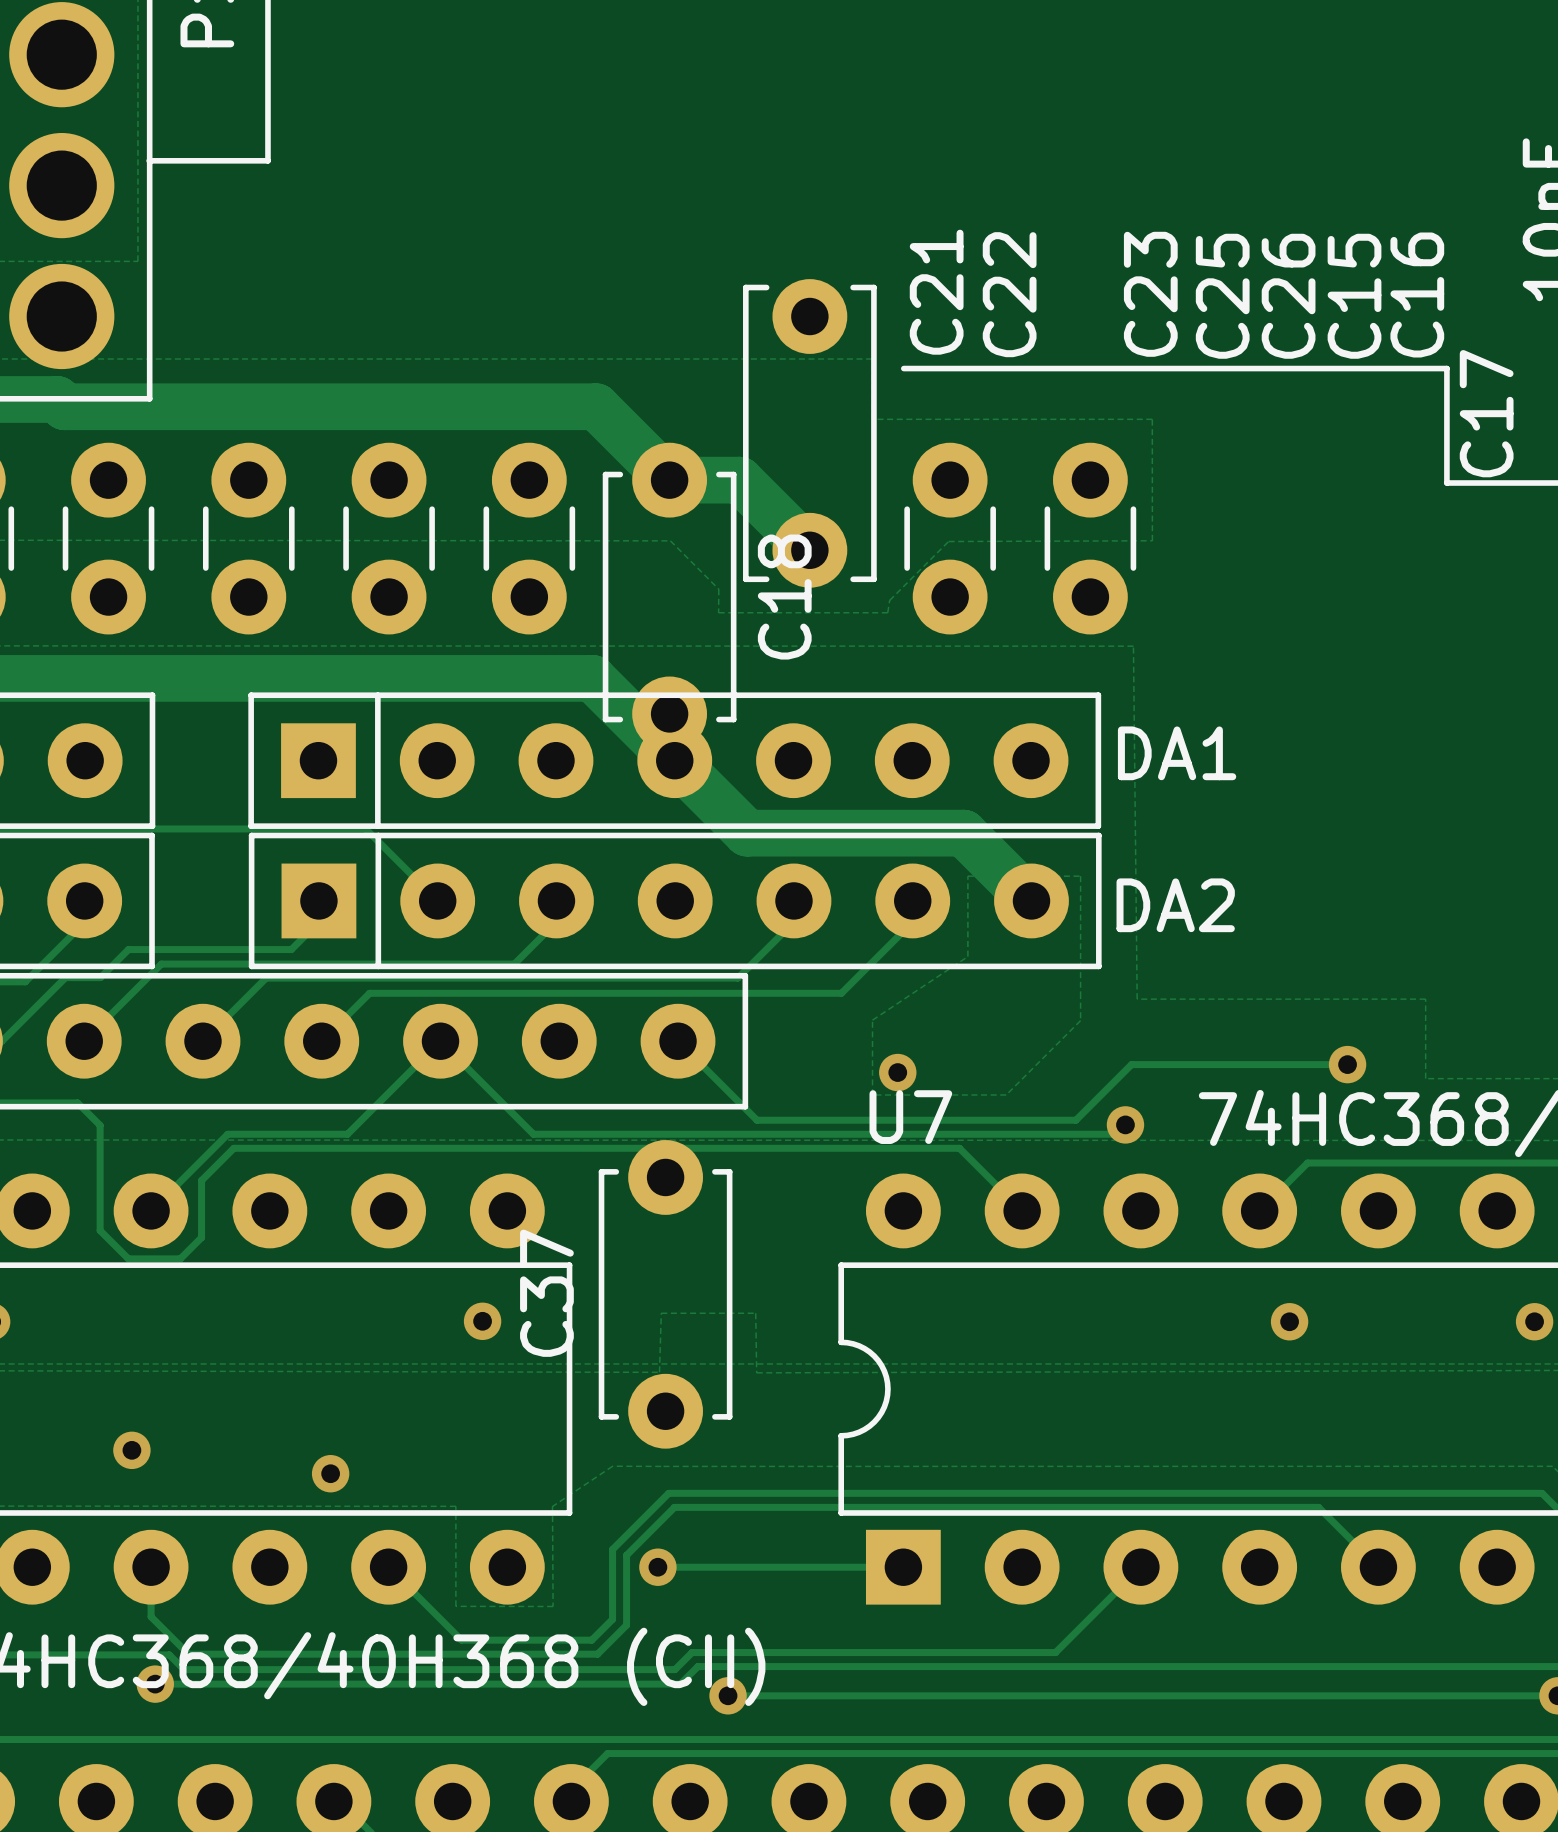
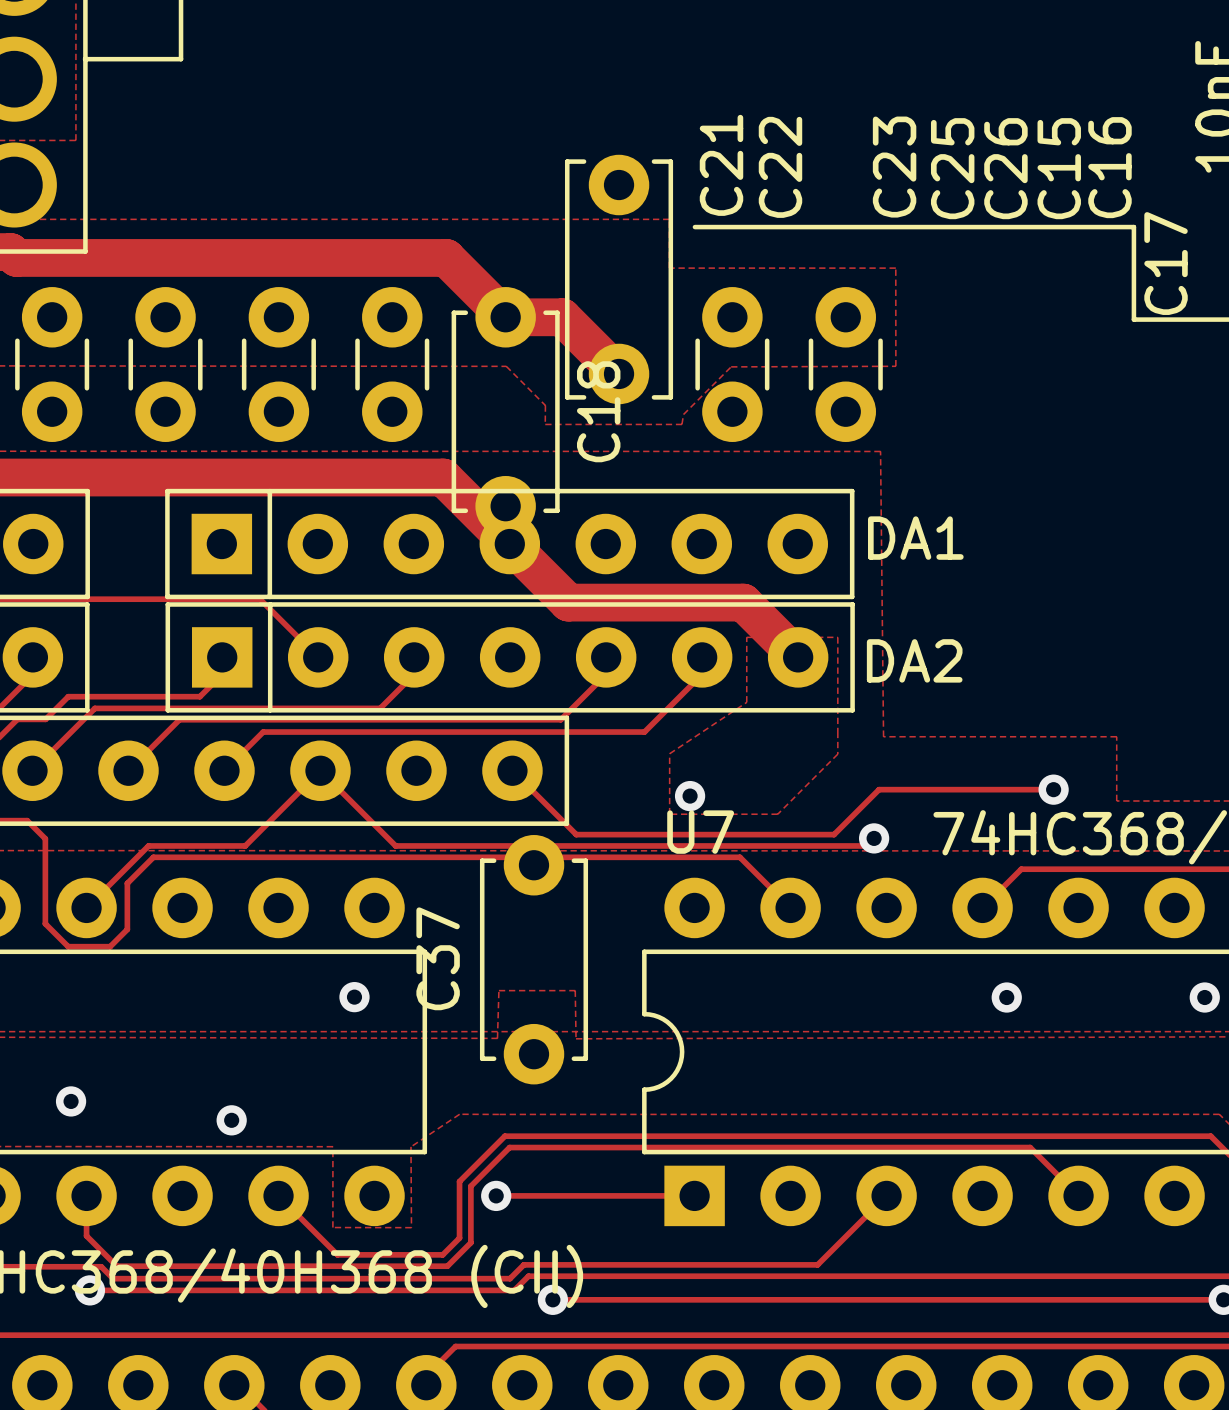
C37 position: (665, 1294) -> (533, 959)

